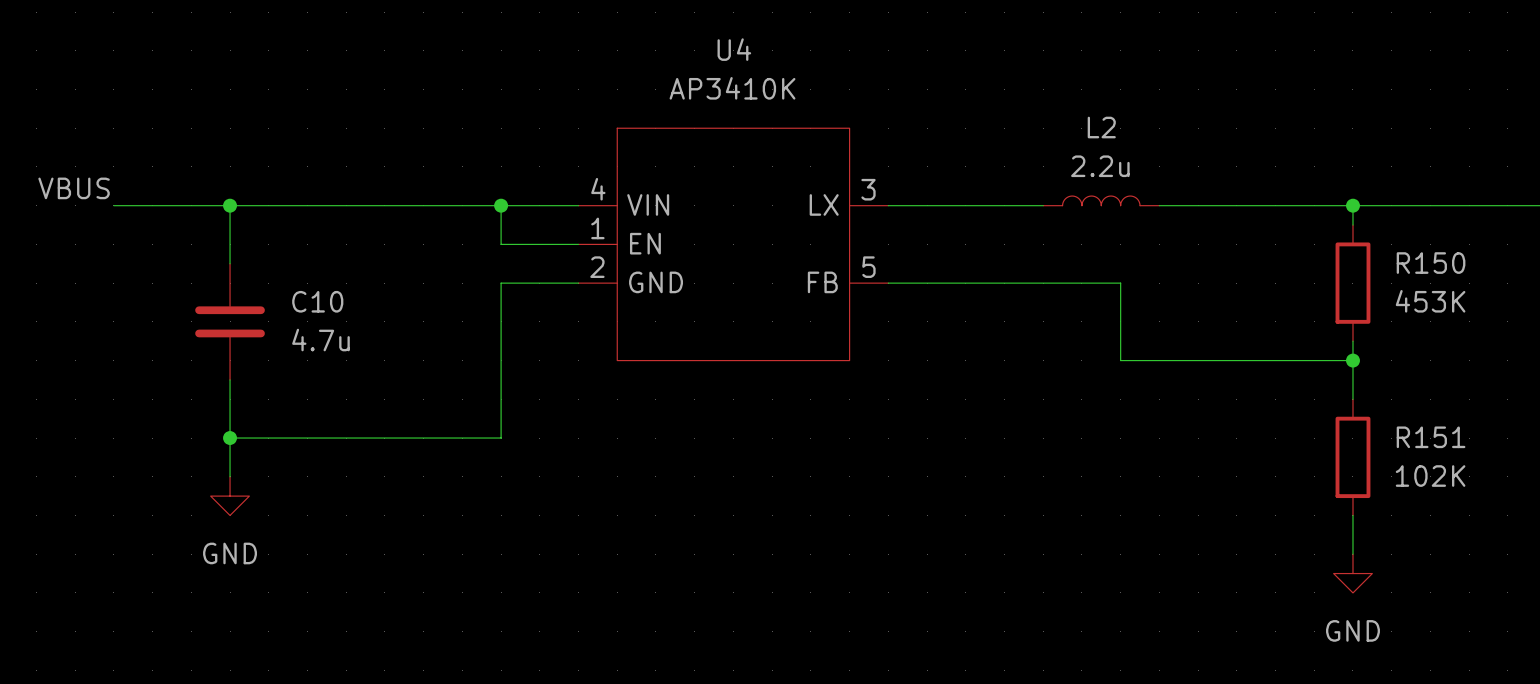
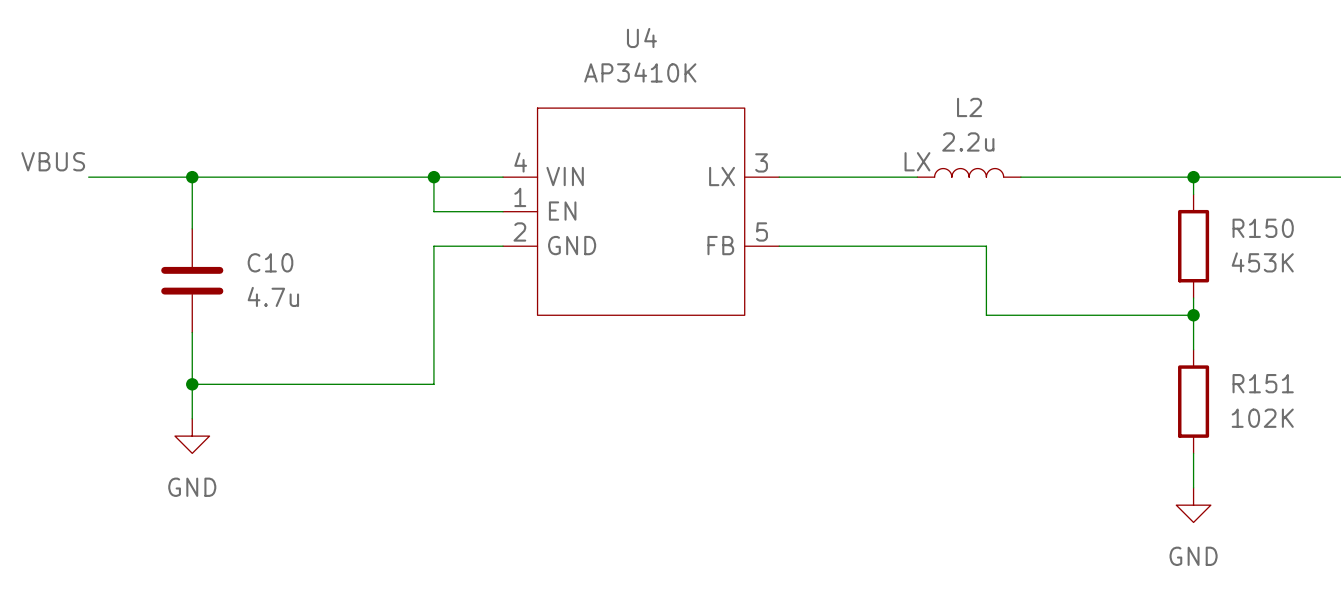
label: none -> LX (917, 161)

